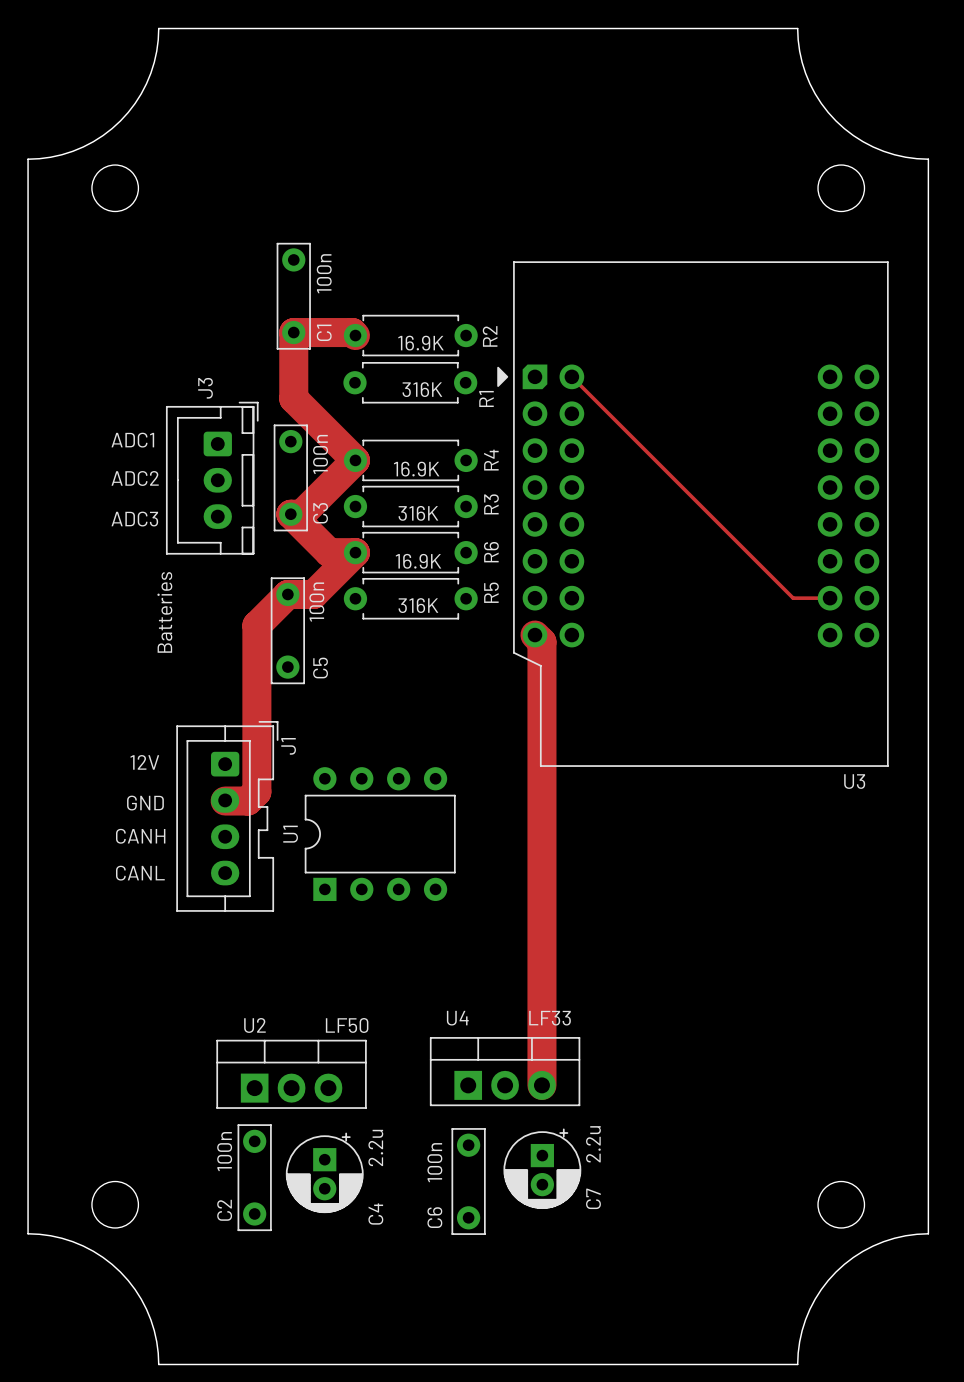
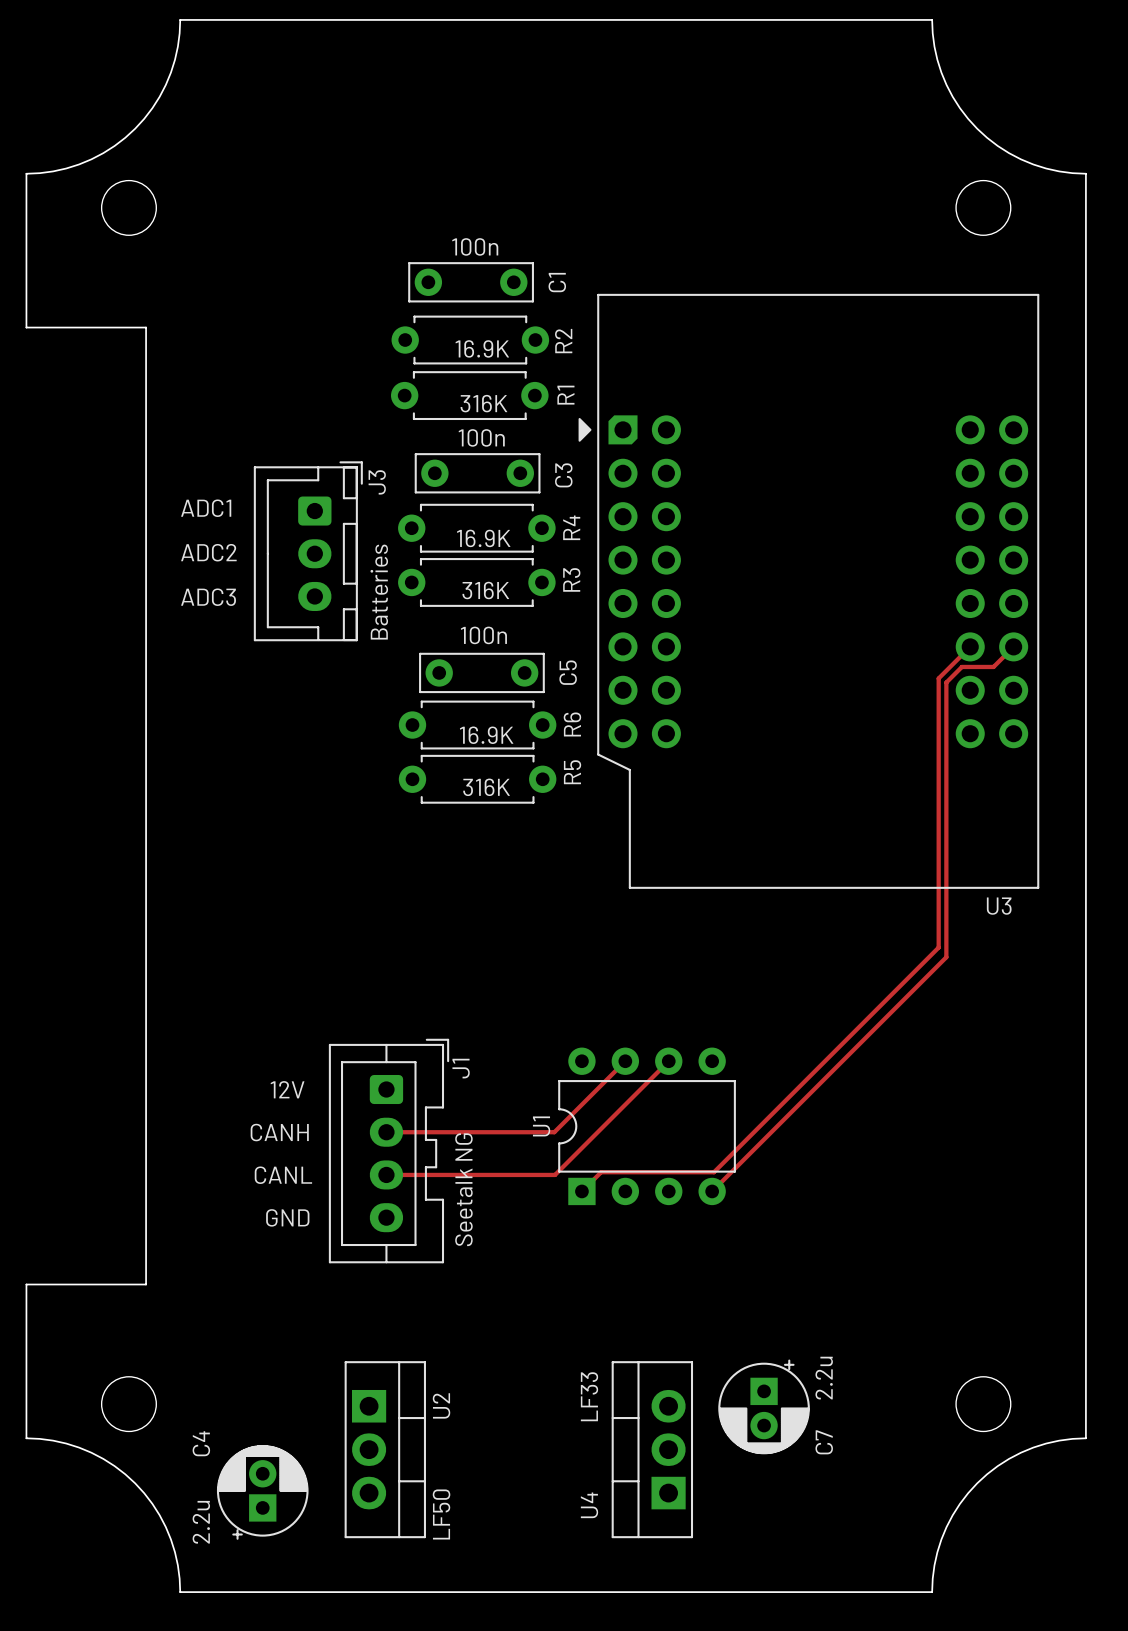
board edge: (28, 289) (28, 1103) -> (26, 327) (146, 327) (146, 1284) (26, 1284)
C1 rotation: 0° (293, 296) -> 90° clockwise (471, 282)
C1 position: (293, 296) -> (471, 282)
C1 name position: C1 (324, 332) -> C1 (557, 282)
track: (355, 335) (352, 332) (293, 332) (293, 398) (355, 460) (301, 514) (290, 514) (329, 552) (355, 552) (313, 594) (287, 594) (256, 625) (256, 791) (247, 801) (225, 801) -> none
R2 position: (410, 335) -> (470, 340)
track: (571, 376) (793, 598) (830, 598) -> none
R1 position: (410, 382) -> (469, 395)
J3 name position: J3 (205, 388) -> J3 (377, 482)
R1 name position: R1 (486, 398) -> R1 (565, 395)
text position: ADC1 (132, 440) -> ADC1 (206, 508)
C3 rotation: 0° (290, 477) -> 90° clockwise (477, 473)
C3 position: (290, 477) -> (477, 473)
text position: ADC2 (135, 478) -> ADC2 (208, 552)
J3 position: (212, 478) -> (308, 551)
C3 name position: C3 (320, 513) -> C3 (563, 475)
text position: ADC3 (134, 519) -> ADC3 (208, 597)
R6 position: (410, 552) -> (477, 725)
track: none -> (970, 646) (938, 678) (938, 947) (714, 1172) (601, 1172) (581, 1191)
track: none -> (1013, 646) (993, 666) (961, 666) (946, 682) (946, 957) (712, 1191)
R5 position: (410, 598) -> (477, 779)
J3 value position: Batteries (164, 612) -> Batteries (379, 592)
C5 rotation: 0° (287, 630) -> 90° clockwise (481, 672)
C5 position: (287, 630) -> (481, 672)
track: (534, 635) (541, 642) (541, 1085) -> none
C5 name position: C5 (320, 668) -> C5 (568, 672)
text position: 12V (144, 762) -> 12V (287, 1089)
text position: GND (145, 803) -> GND (287, 1217)
J1 position: (227, 816) -> (389, 1151)
U1 position: (380, 834) -> (647, 1126)
text position: CANH (140, 836) -> CANH (279, 1132)
text position: CANL (140, 873) -> CANL (283, 1175)
track: none -> (625, 1061) (554, 1132) (386, 1132)
track: none -> (668, 1061) (555, 1174) (386, 1174)
J1 value: none -> Seetalk NG (463, 1189)
U4 rotation: 0° (505, 1071) -> 90° counterclockwise (652, 1449)
U4 position: (505, 1071) -> (652, 1449)
U2 rotation: 0° (291, 1074) -> 90° clockwise (385, 1449)
U2 position: (291, 1074) -> (385, 1449)
C7 position: (542, 1168) -> (764, 1406)
C4 rotation: 0° (324, 1172) -> 180° (262, 1492)
C4 position: (324, 1172) -> (262, 1492)
C2: 100n (254, 1177) -> none
C6: 100n (468, 1181) -> none

